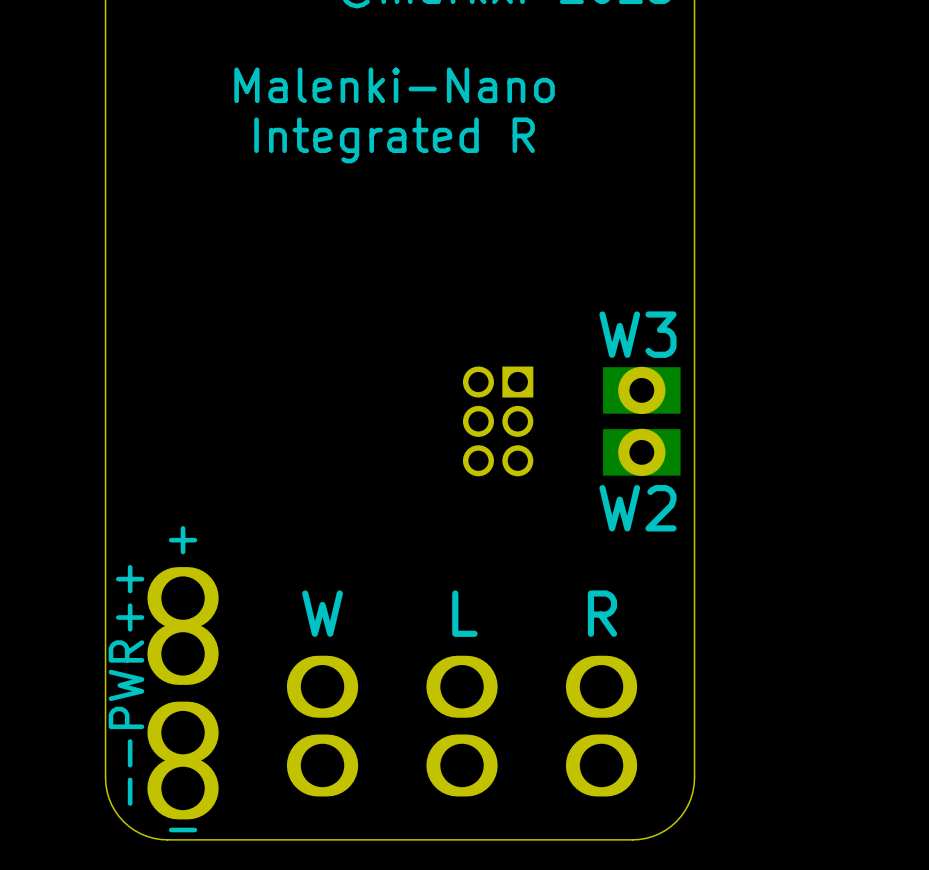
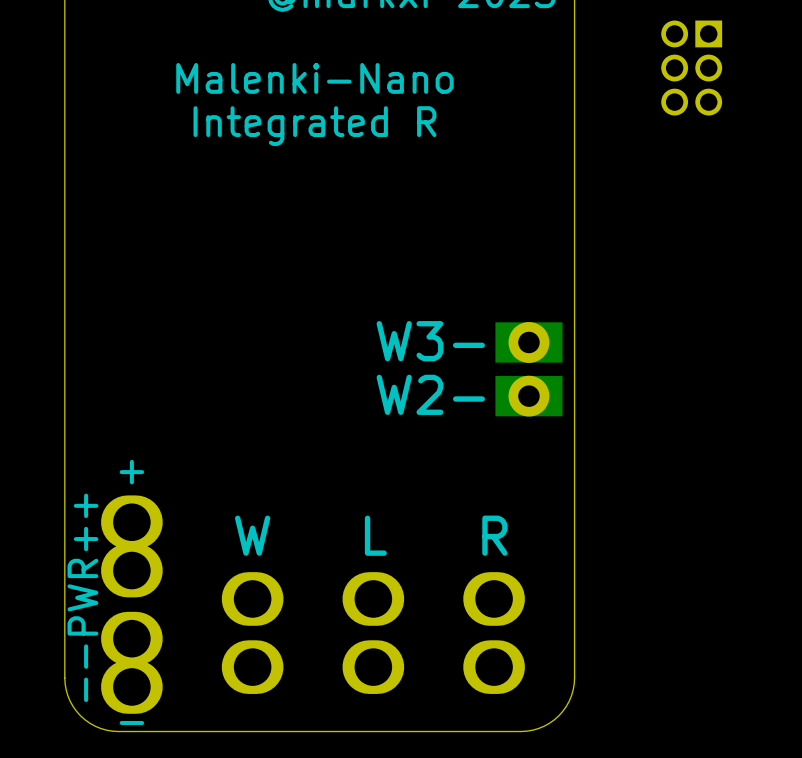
text: W3 (637, 334) -> W3- (430, 341)
part position: (498, 421) -> (691, 68)
text: W2 (637, 508) -> W2- (430, 394)

